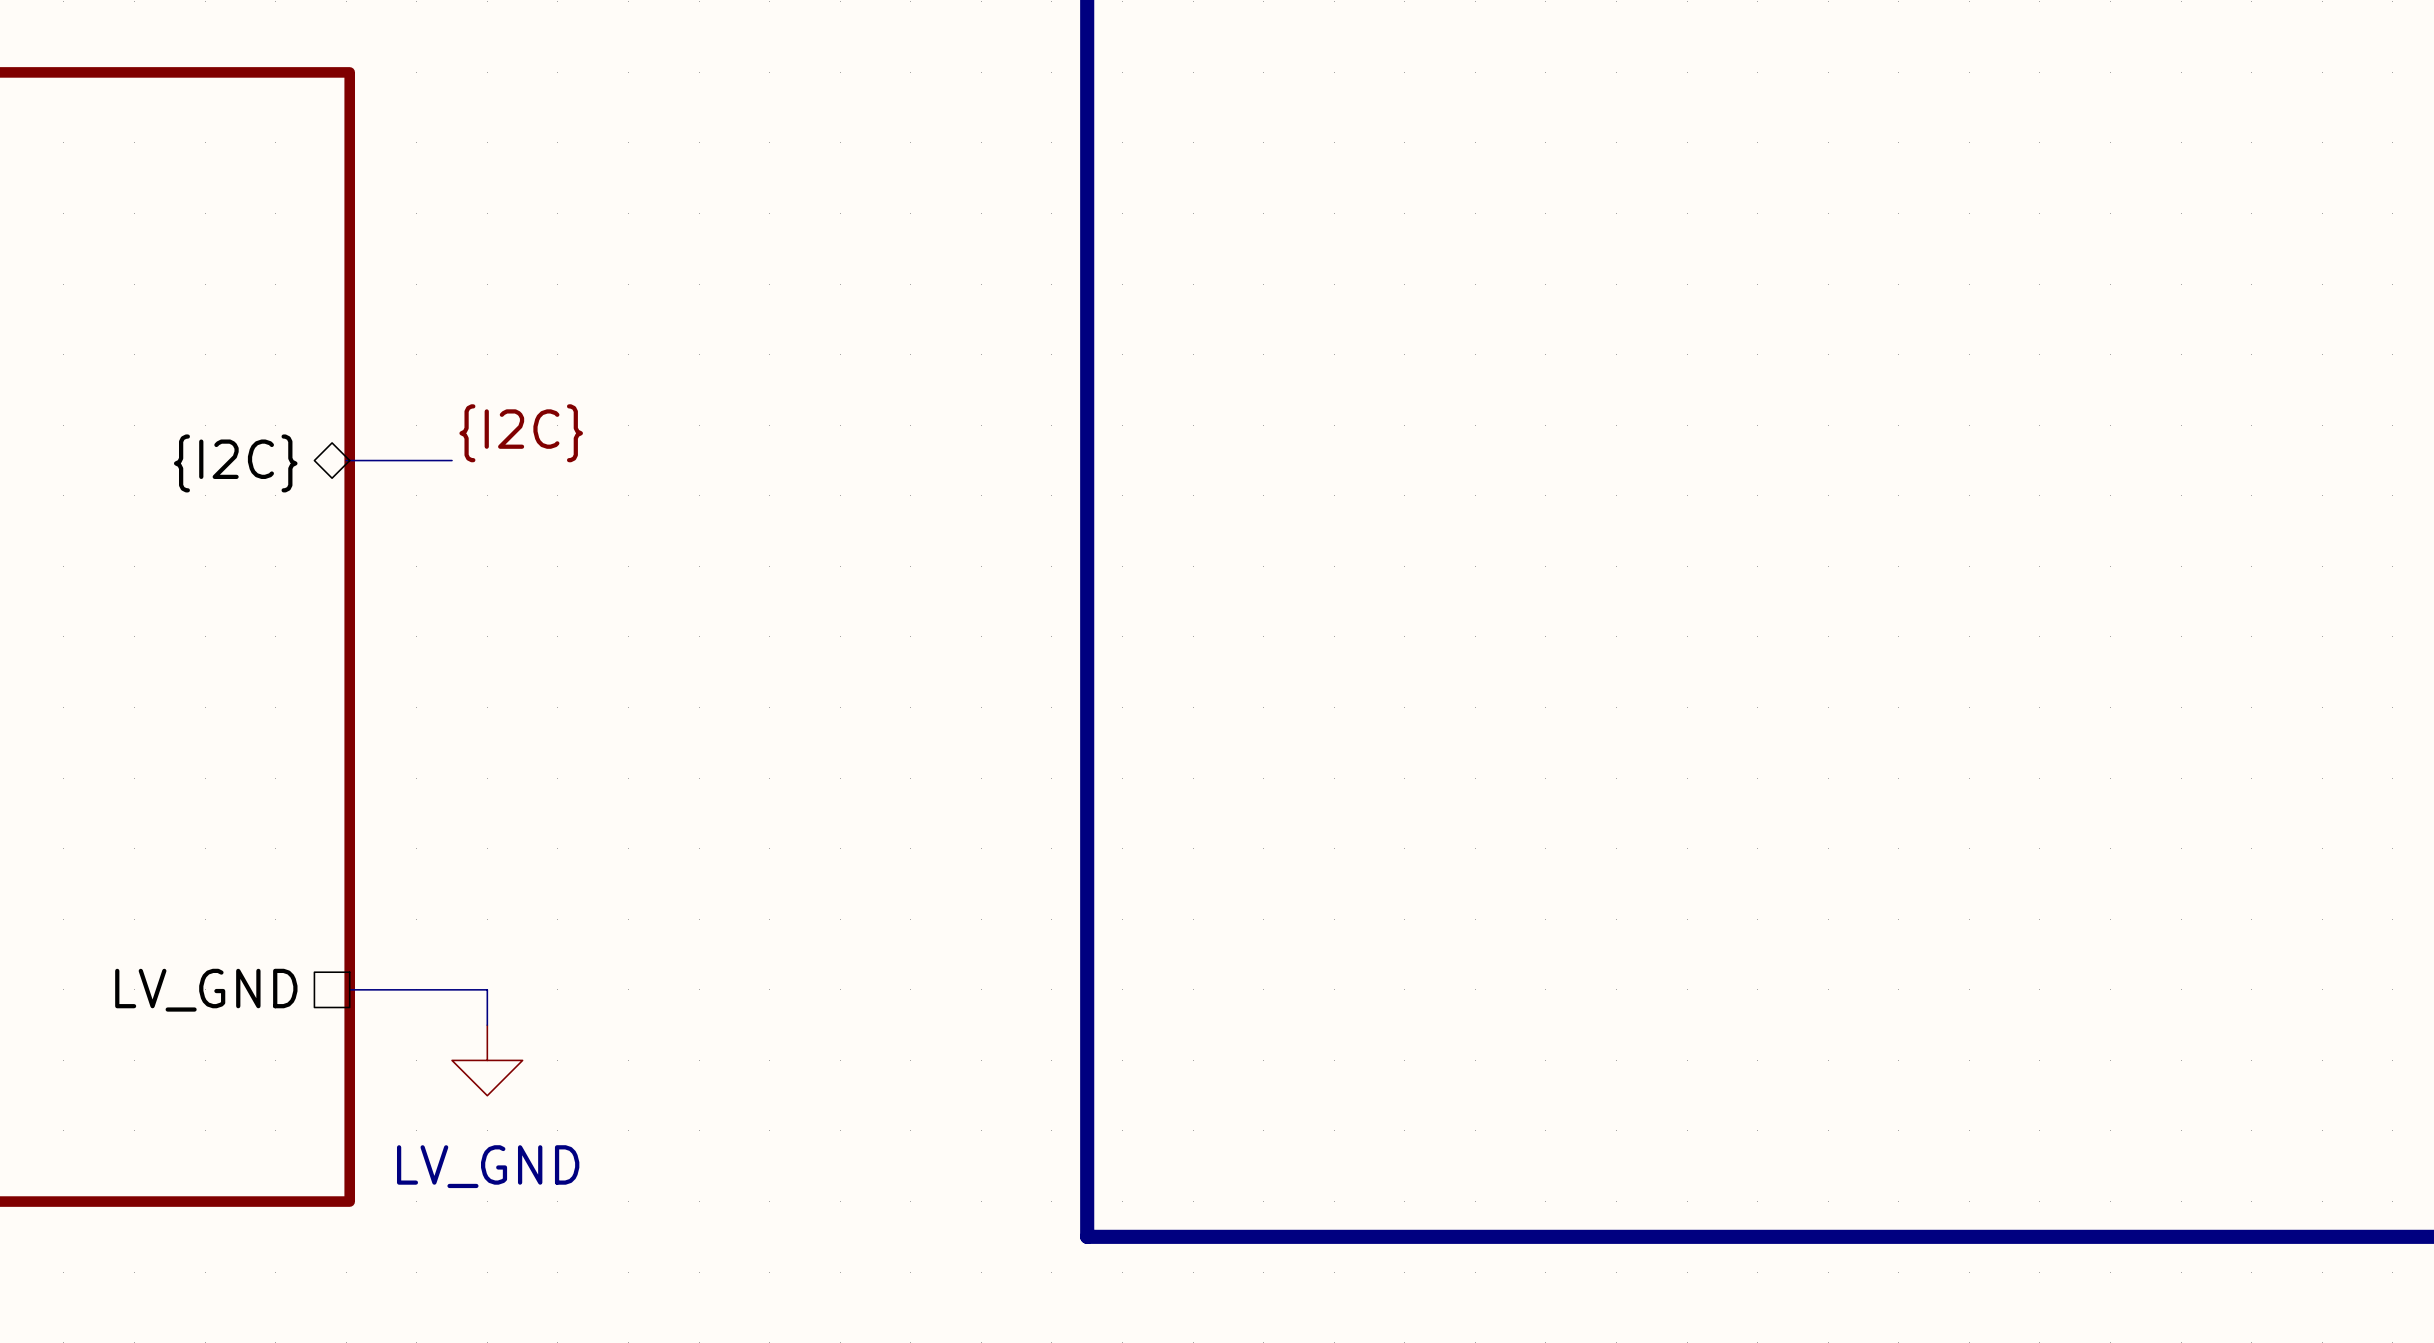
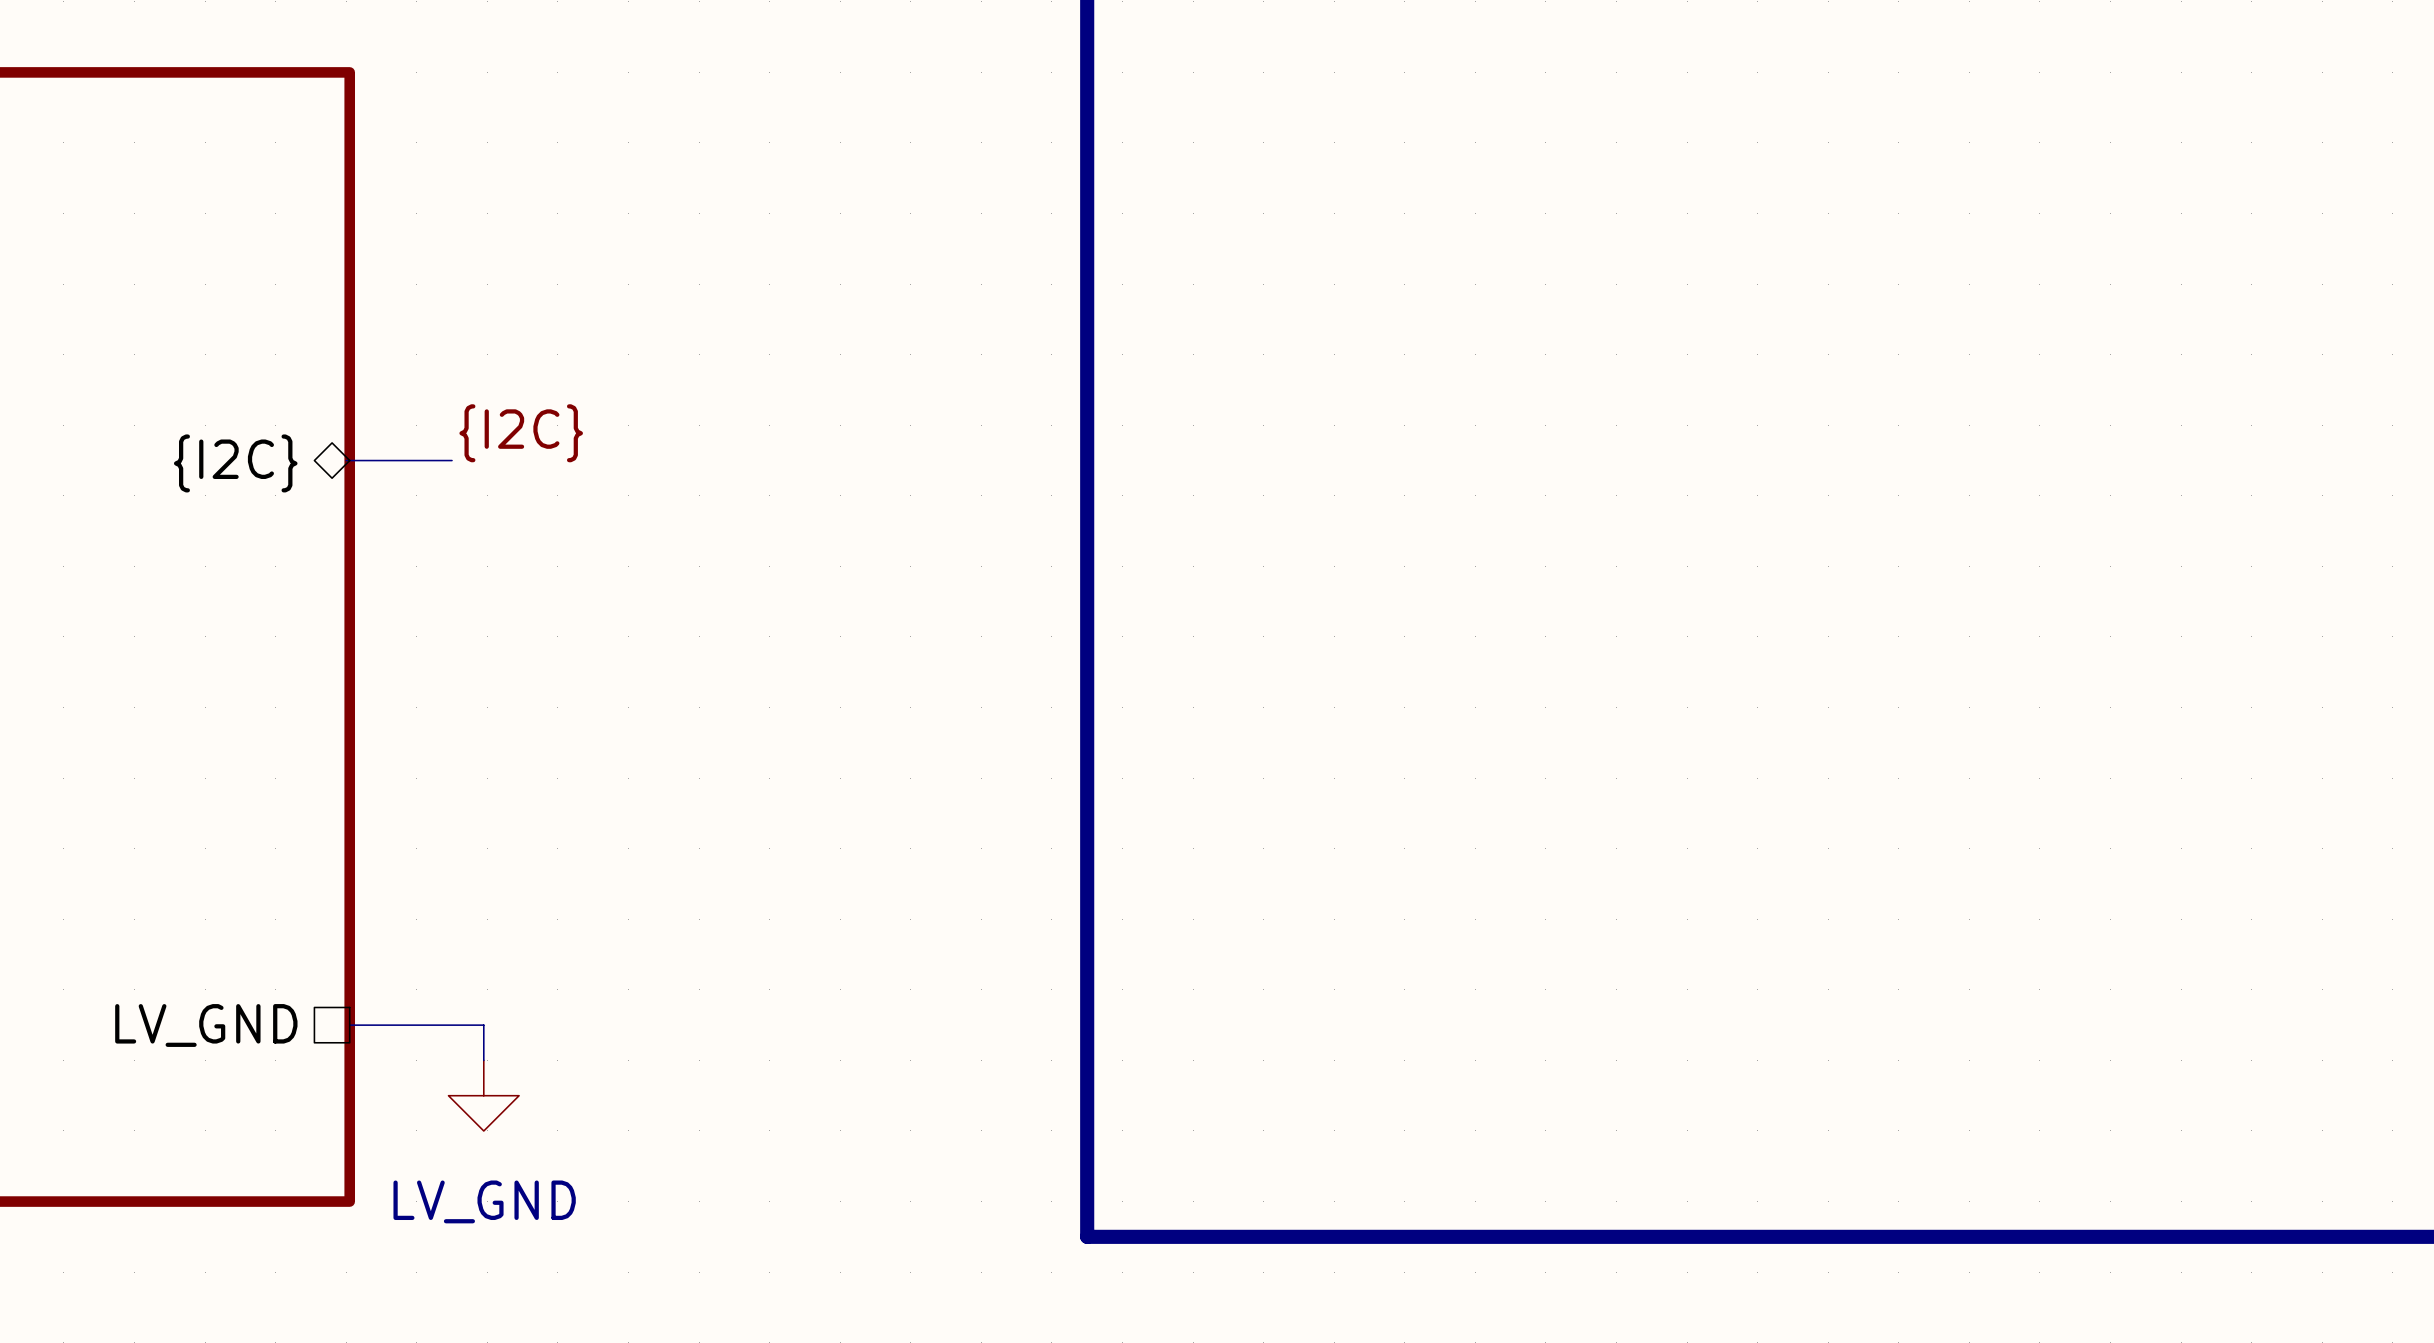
wire: (349, 989) (487, 989) (487, 1025) -> none
sheet pin position: LV_GND (206, 990) -> LV_GND (206, 1025)
wire: none -> (349, 1025) (483, 1025) (483, 1060)
power symbol position: LV_GND (487, 1060) -> LV_GND (483, 1095)

